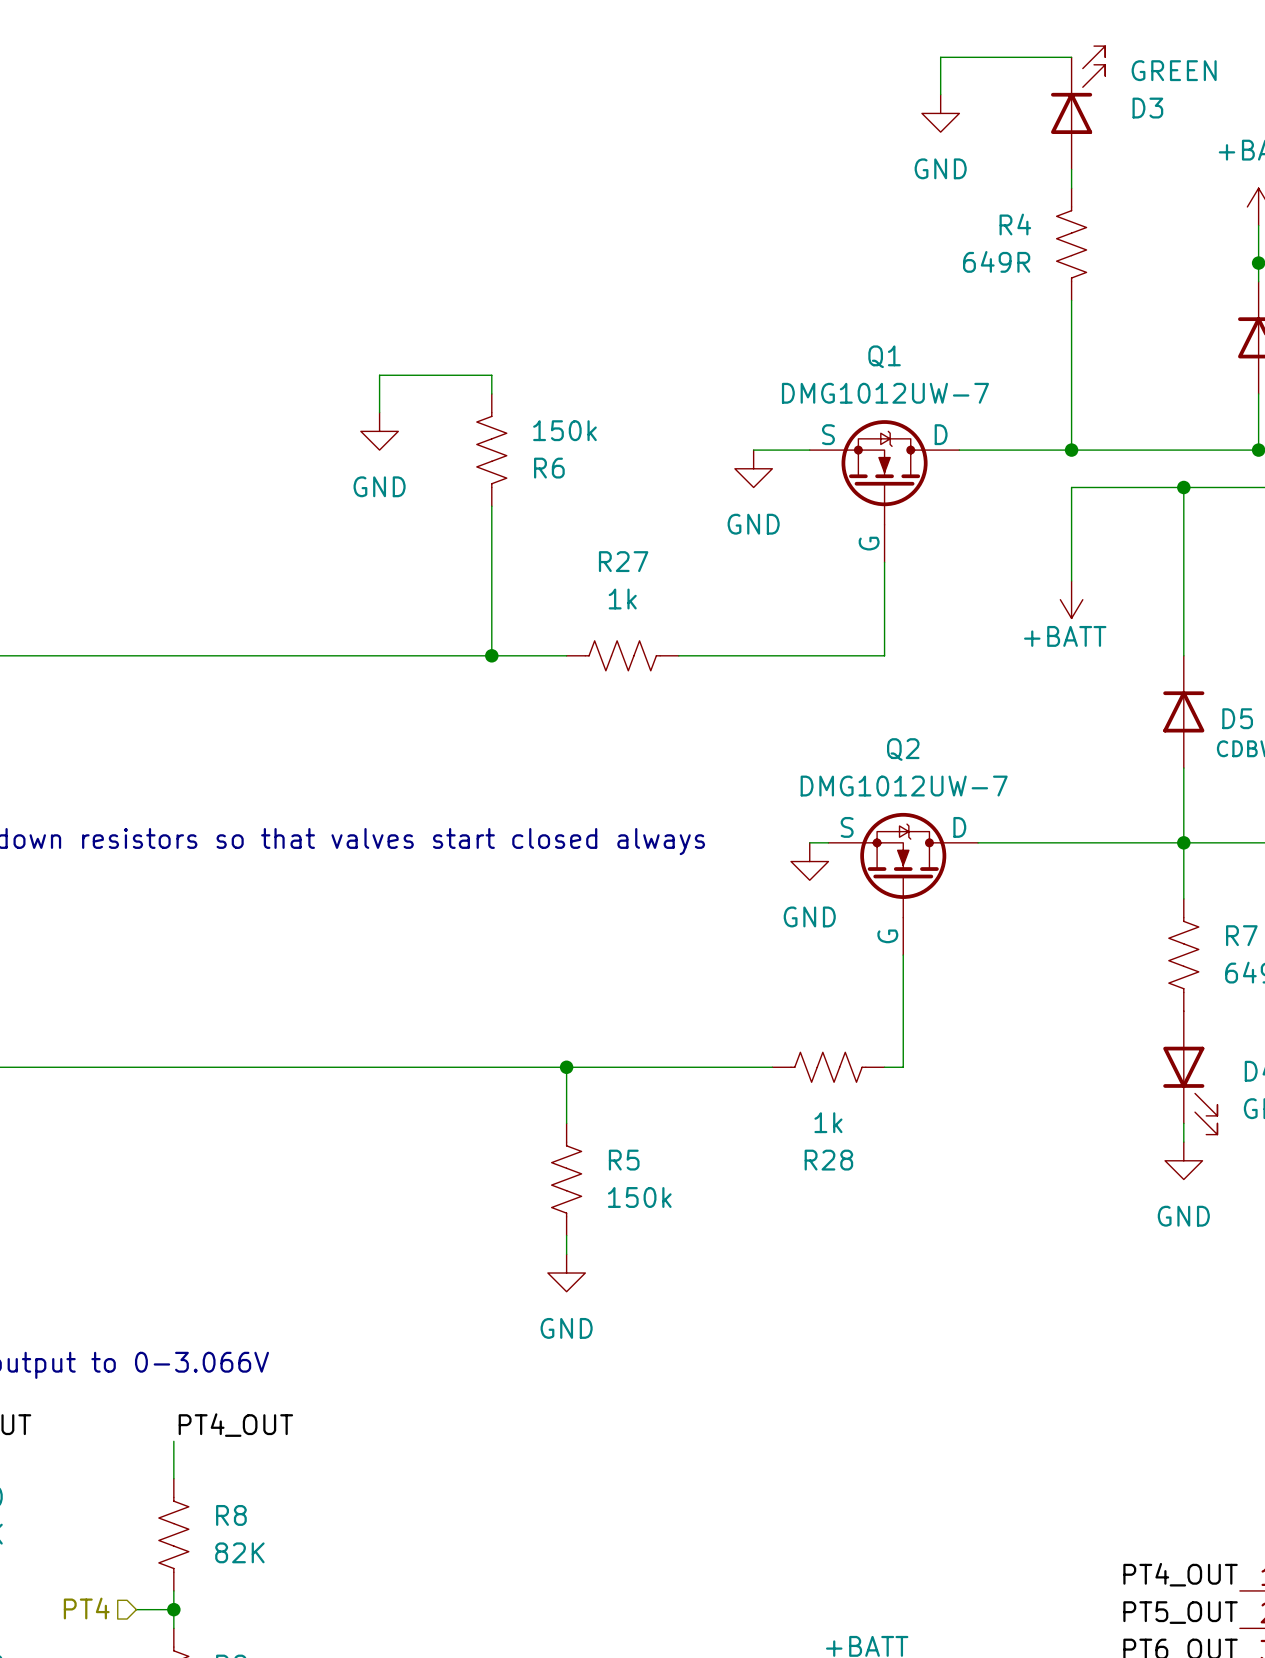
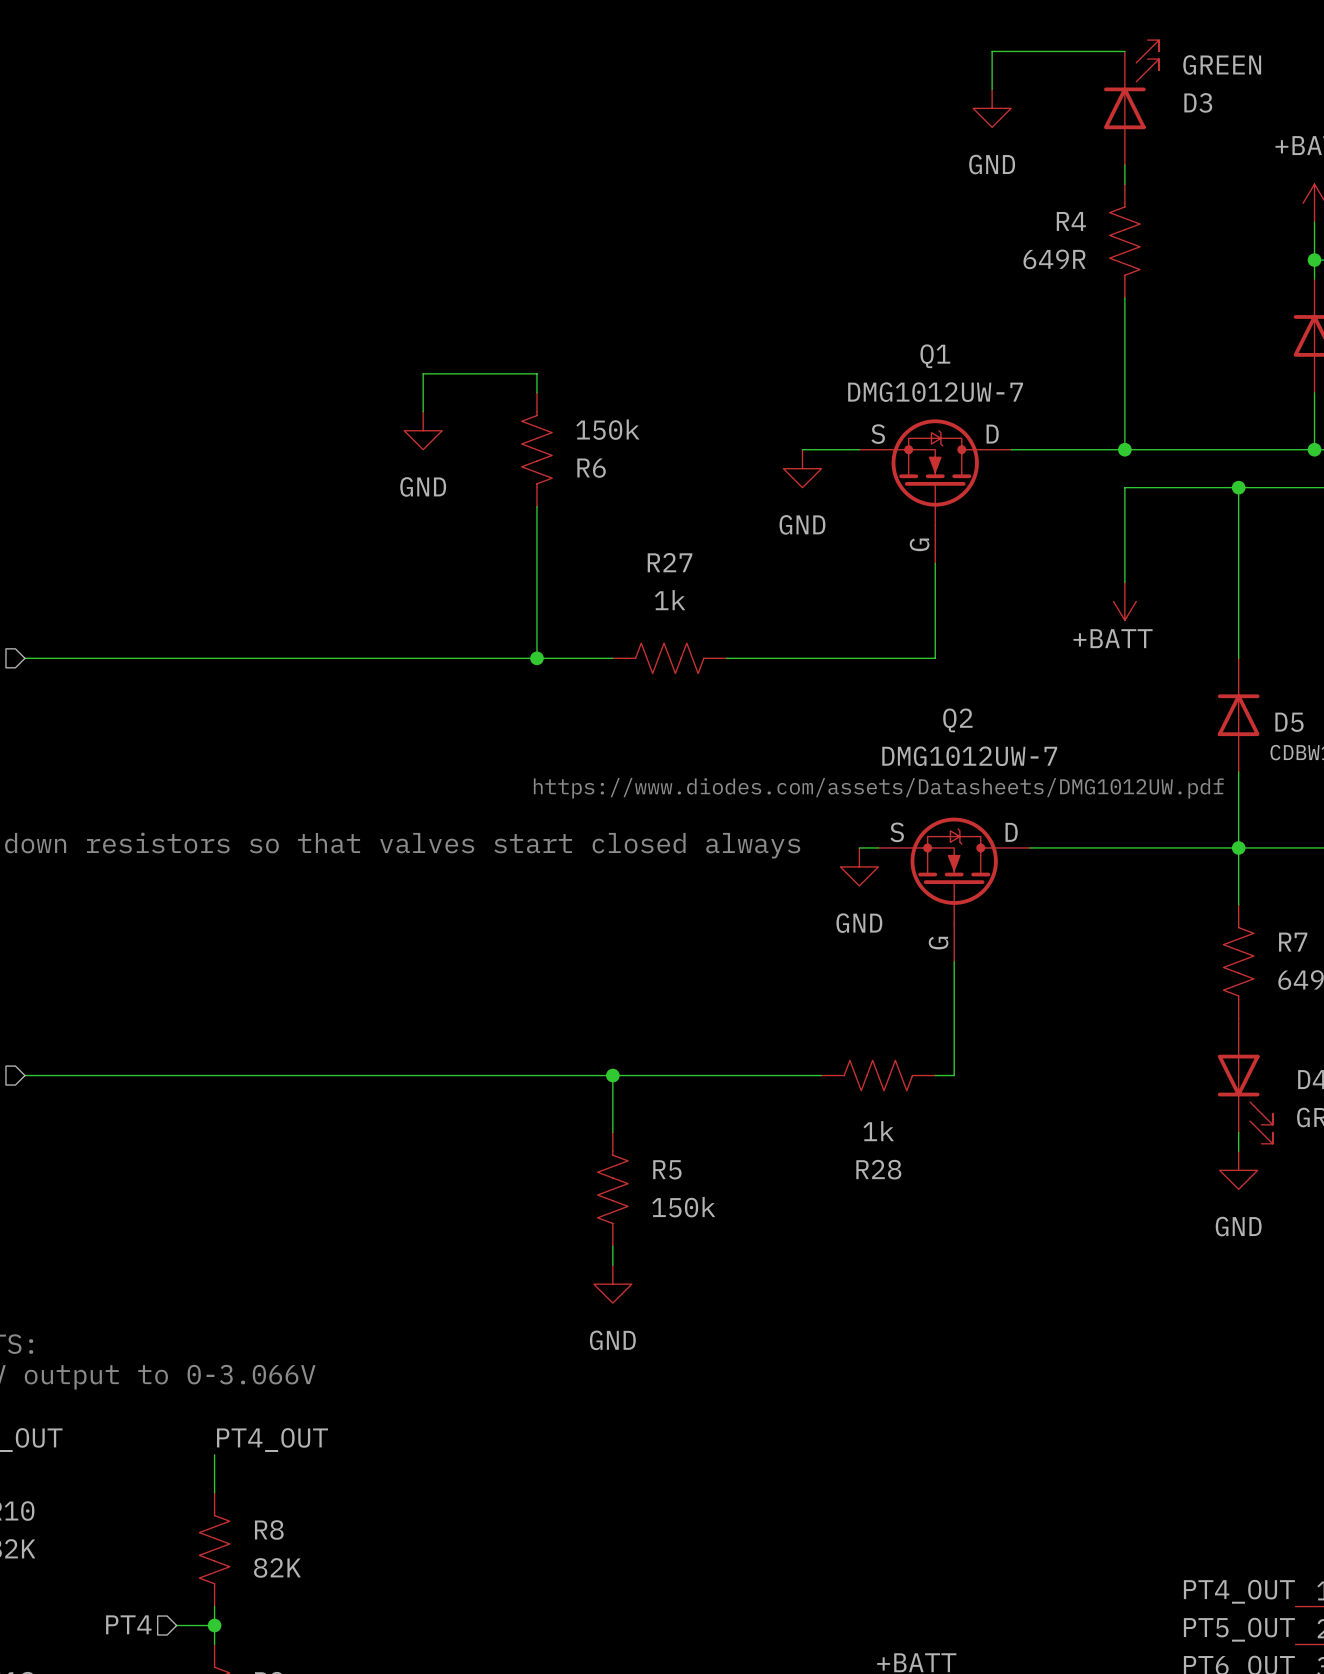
Q2 name position: Q2 (903, 749) -> Q2 (957, 720)
text: none -> https://www.diodes.com/assets/Datasheets/DMG1012UW.pdf (878, 788)
Q2 value position: DMG1012UW-7 (904, 786) -> DMG1012UW-7 (969, 756)

